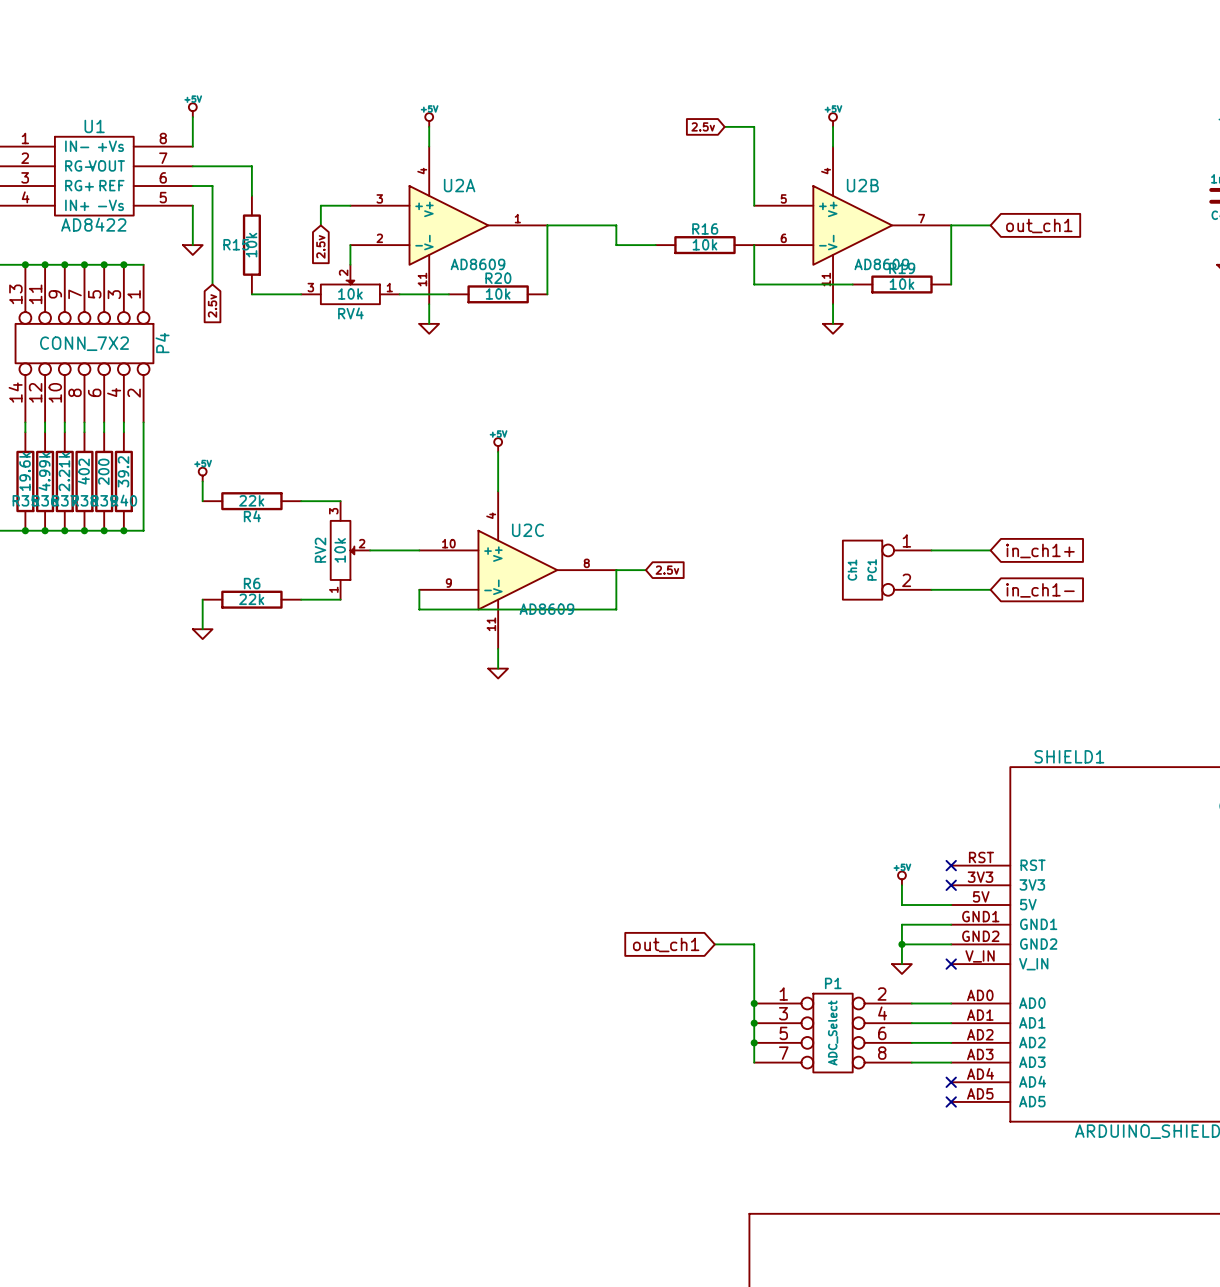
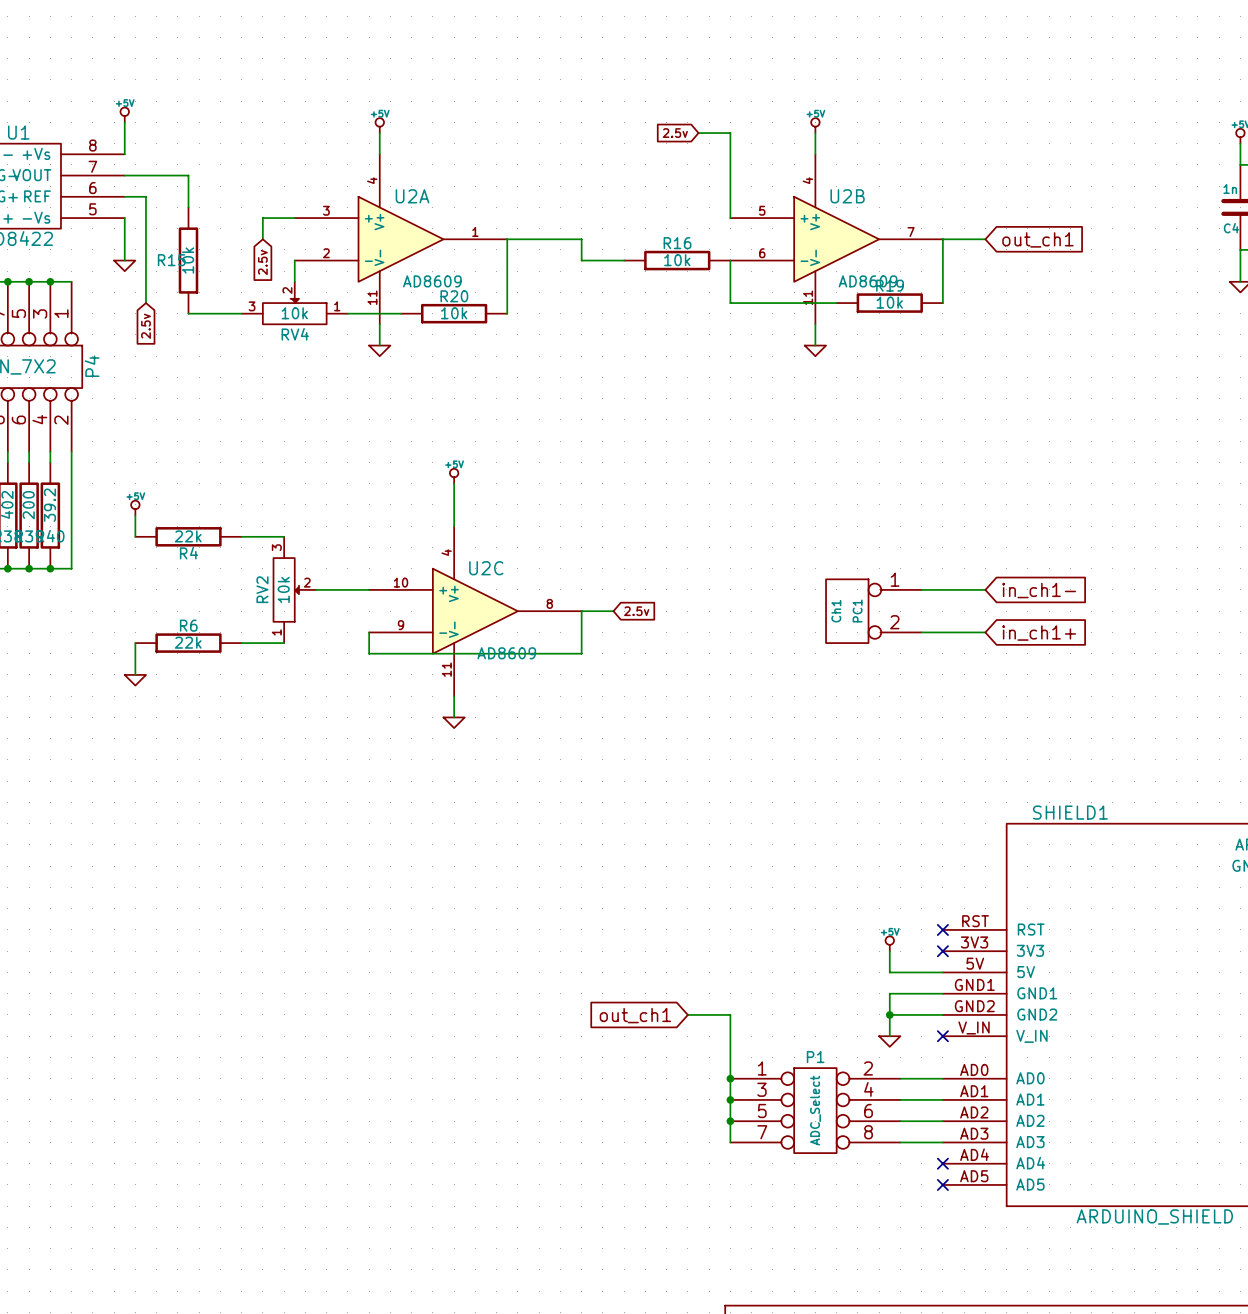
global label: in_ch1+ (1040, 550) -> in_ch1- (1039, 590)
global label: in_ch1- (1040, 590) -> in_ch1+ (1039, 633)

